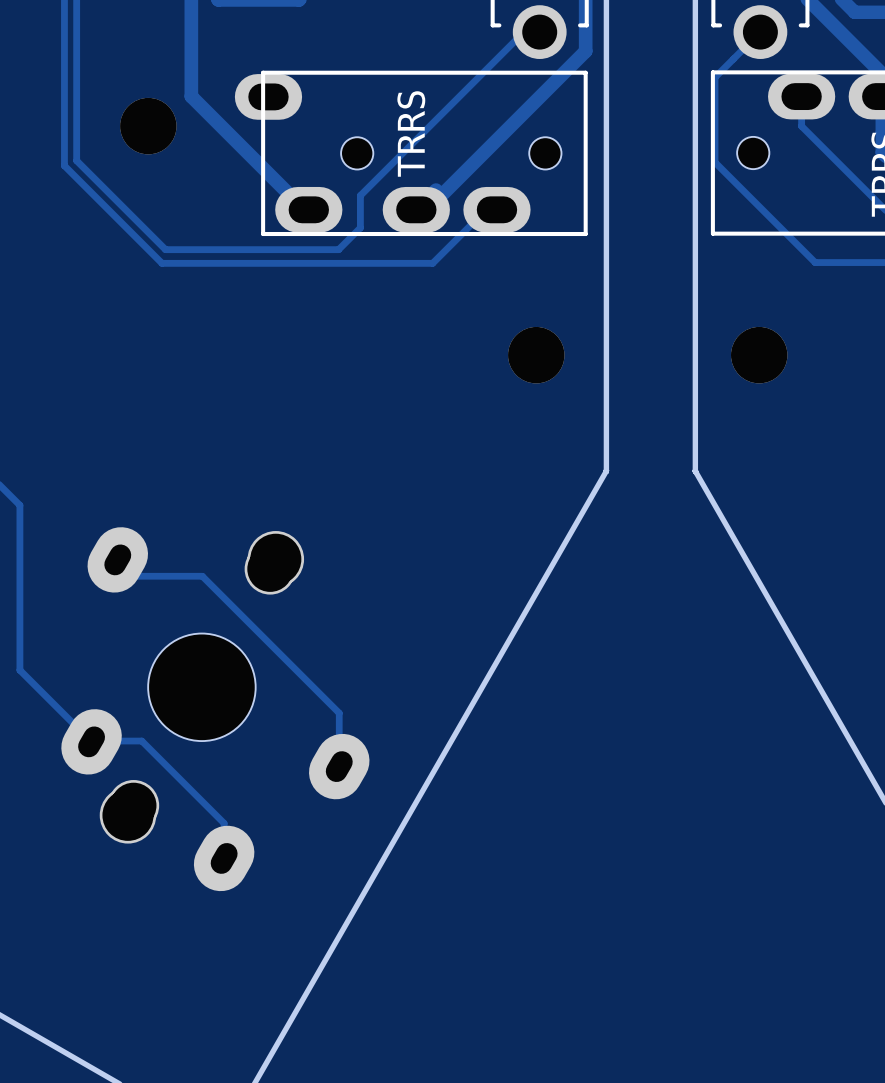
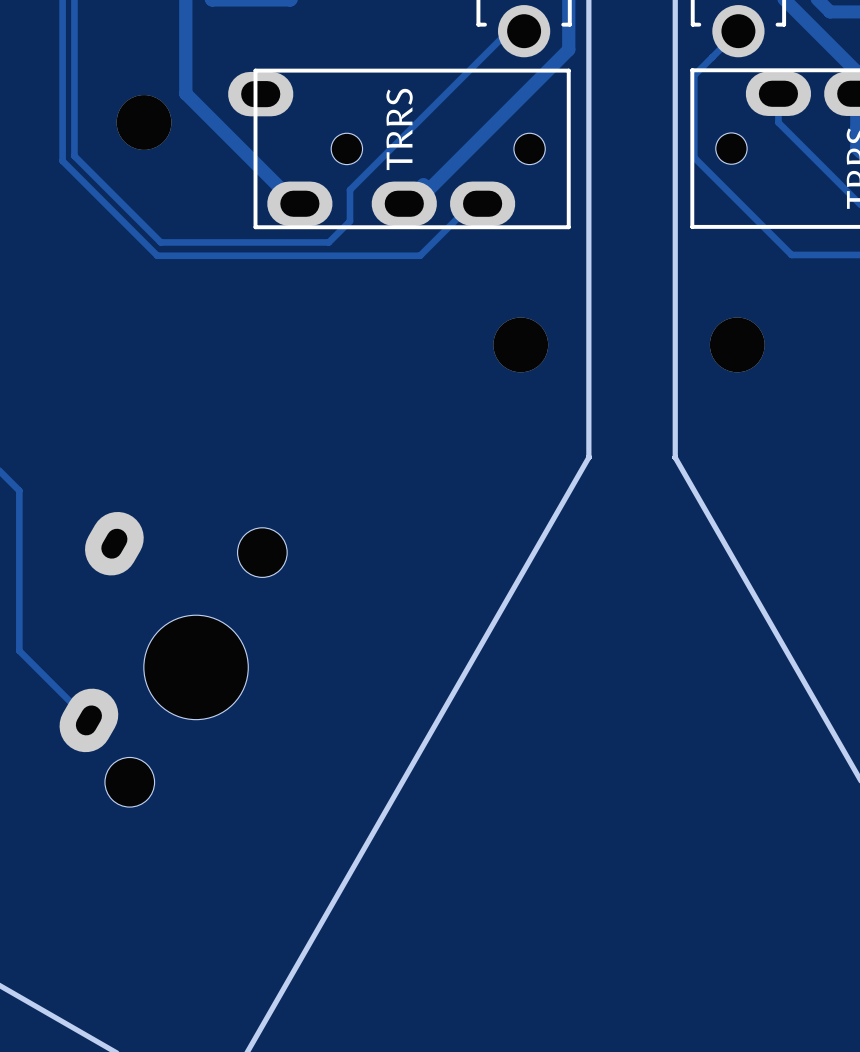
track: (117, 559) (134, 576) (202, 576) (339, 713) (339, 766) -> none
part: none -> (173, 659)
part: (215, 709) -> none
track: (91, 741) (141, 741) (224, 823) (224, 858) -> none

